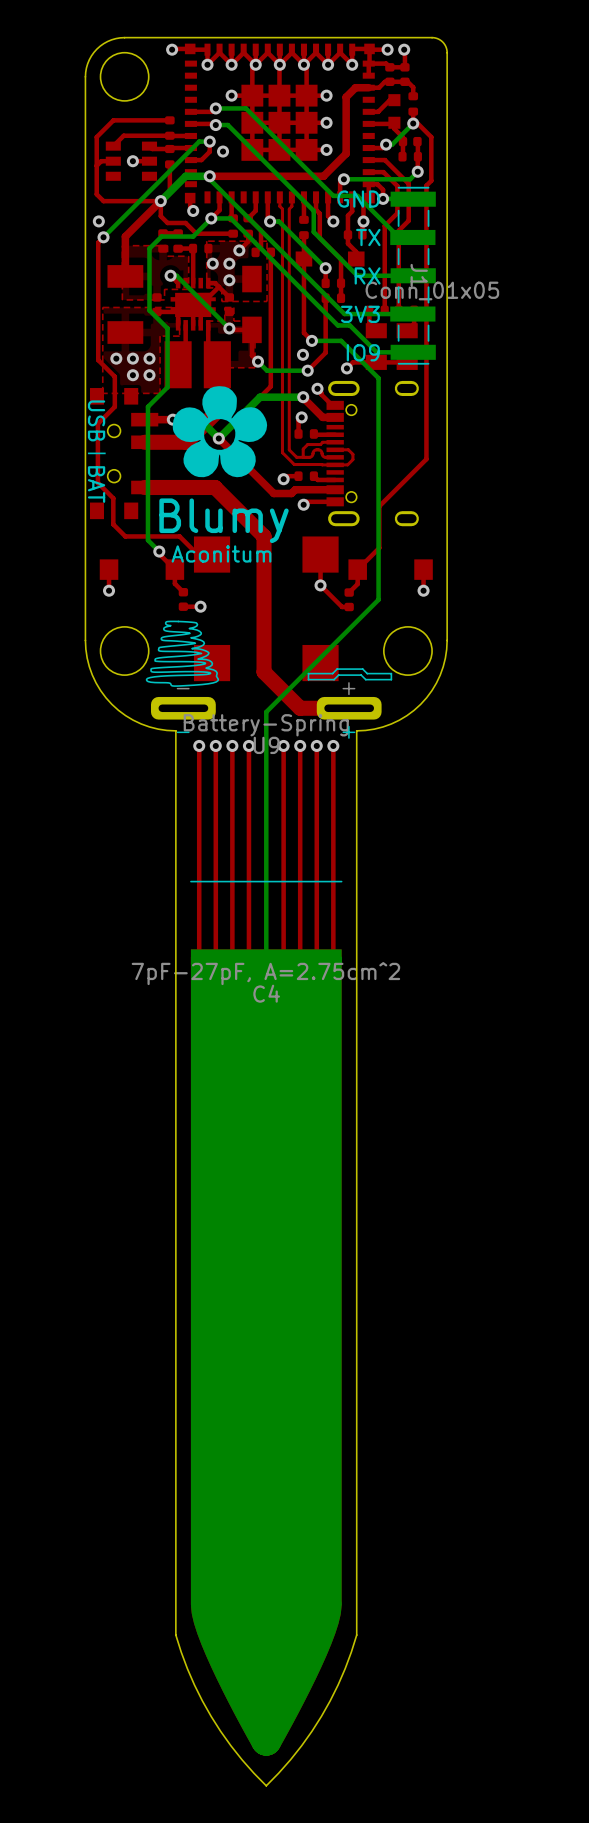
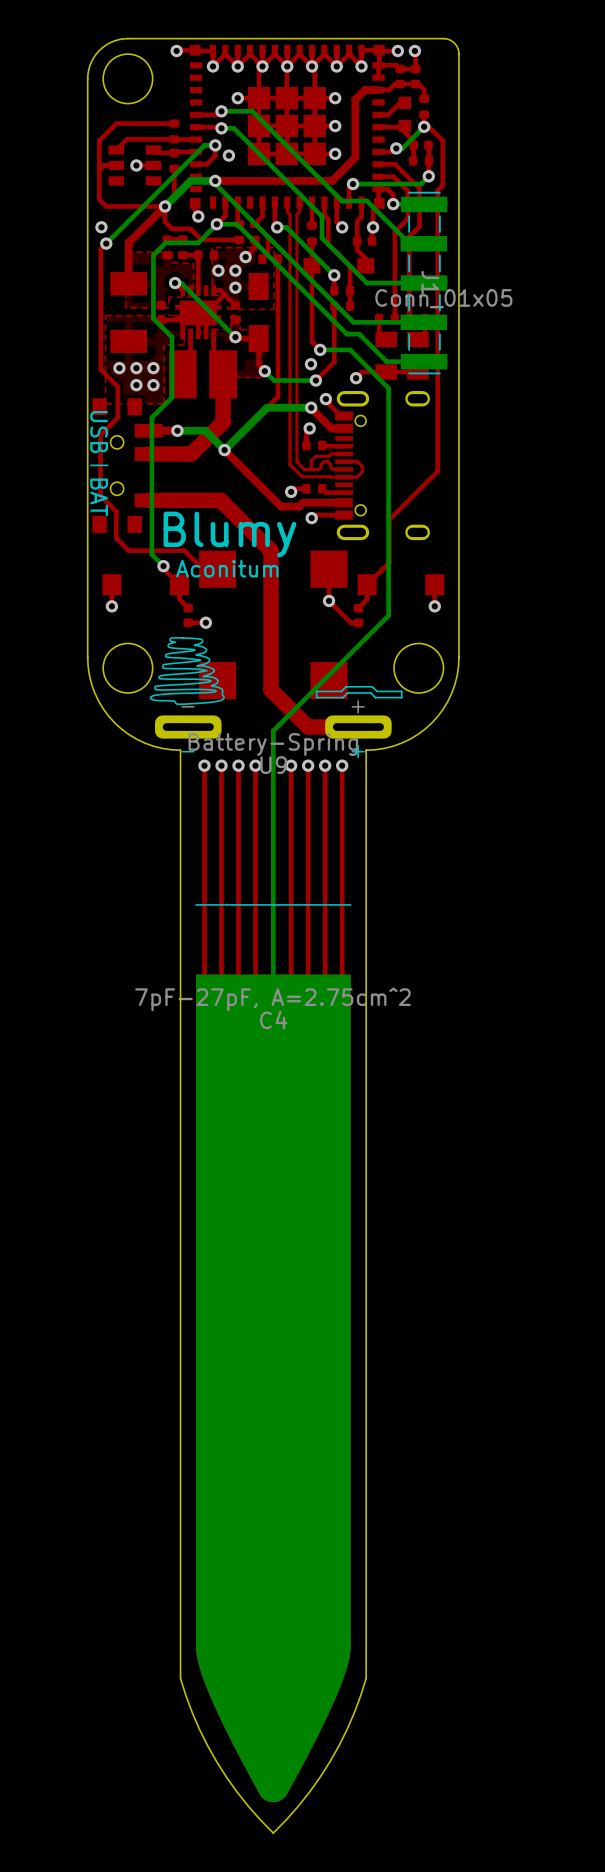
text: GND (358, 199) -> none
text: TX (368, 237) -> none
text: RX (367, 275) -> none
text: 3V3 (360, 314) -> none
text: IO9 (363, 352) -> none
drawing: [172, 386, 268, 478] -> none

